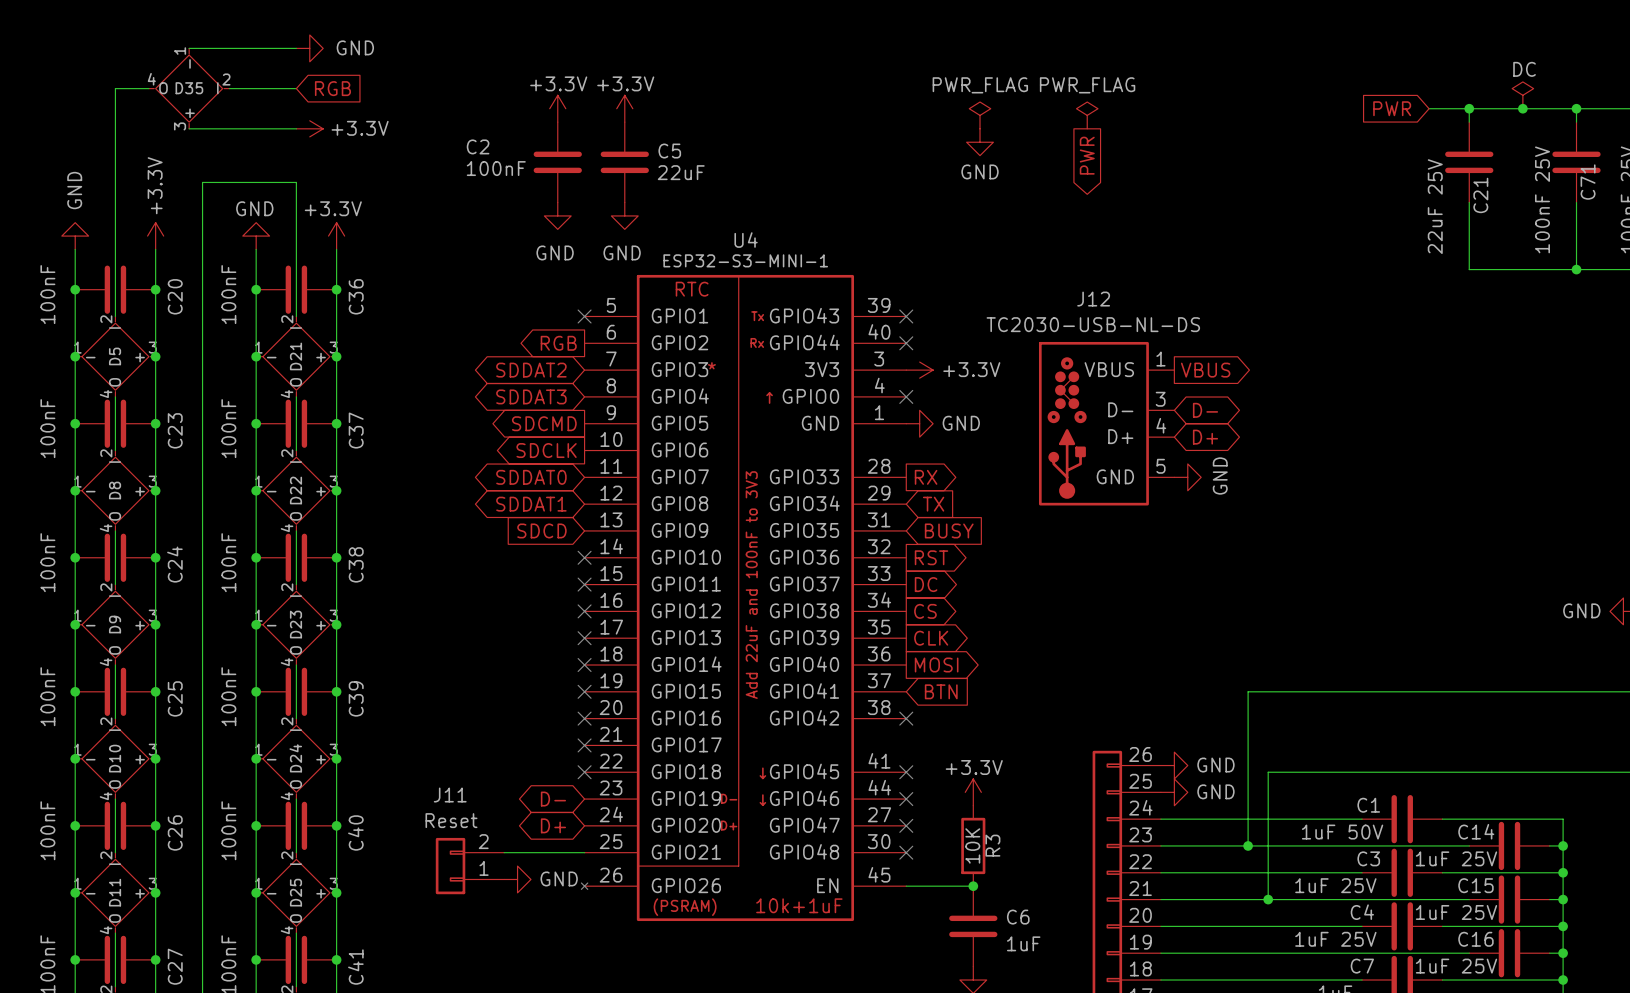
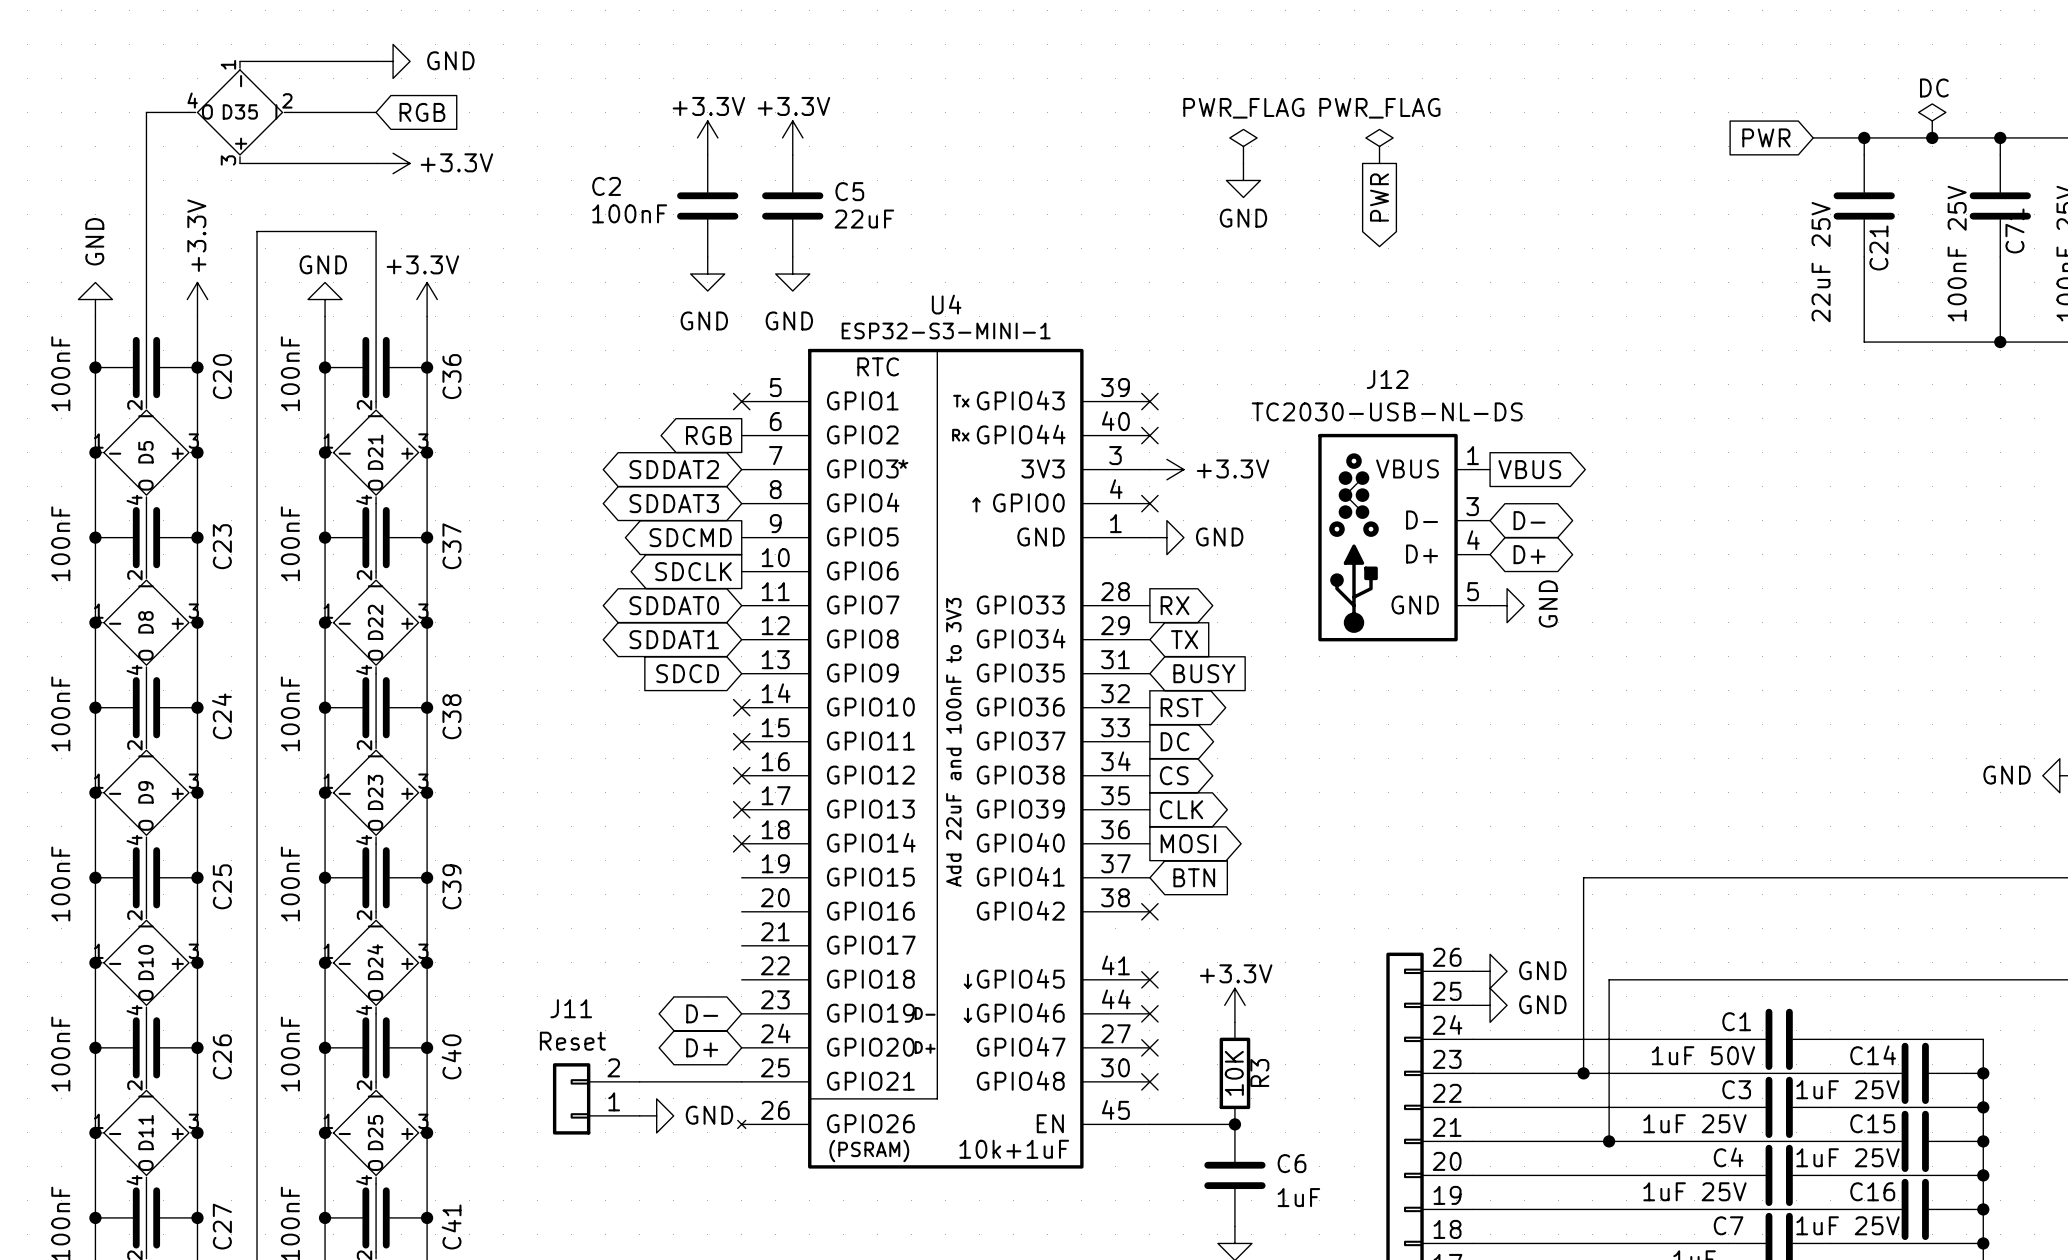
no-connect mark: (584, 691) -> none
no-connect mark: (584, 718) -> none
no-connect mark: (584, 745) -> none
no-connect mark: (584, 772) -> none

